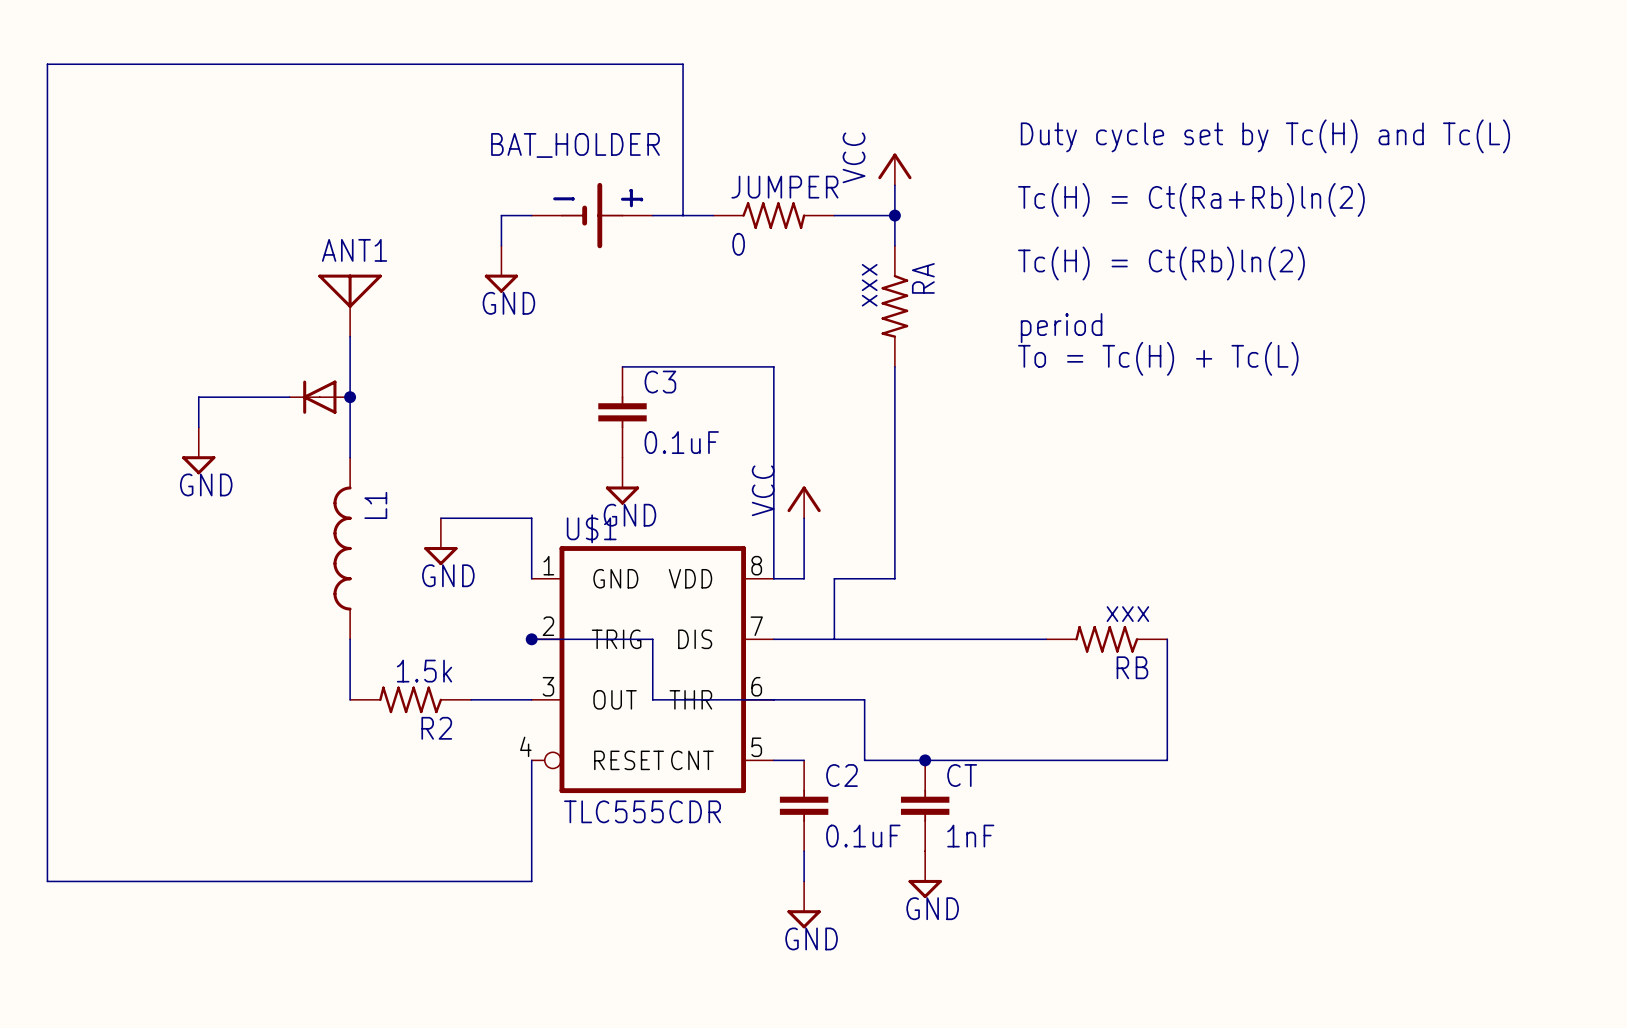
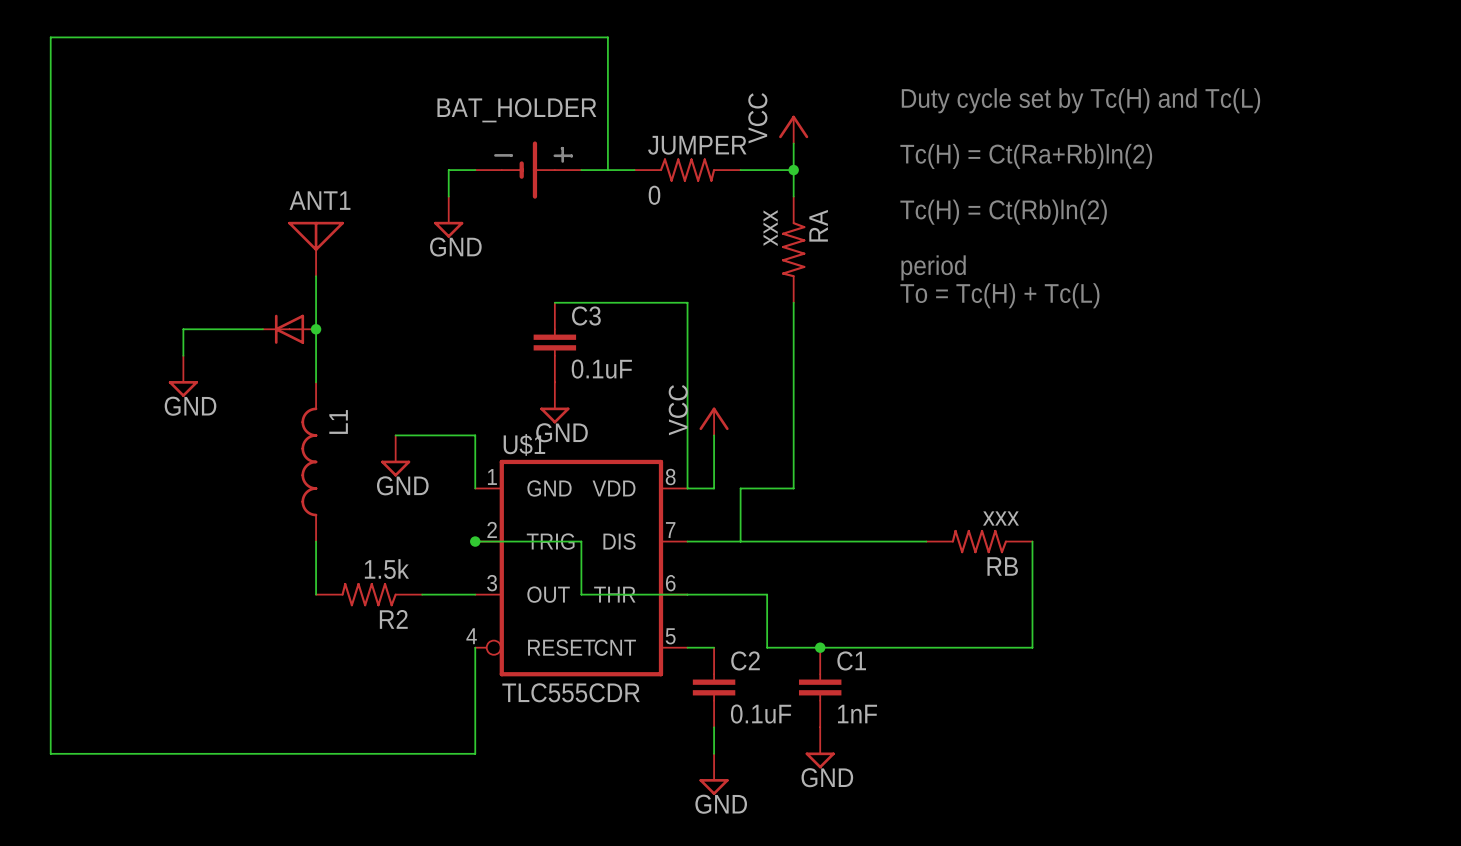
CT name: CT (962, 775) -> C1 (851, 660)

